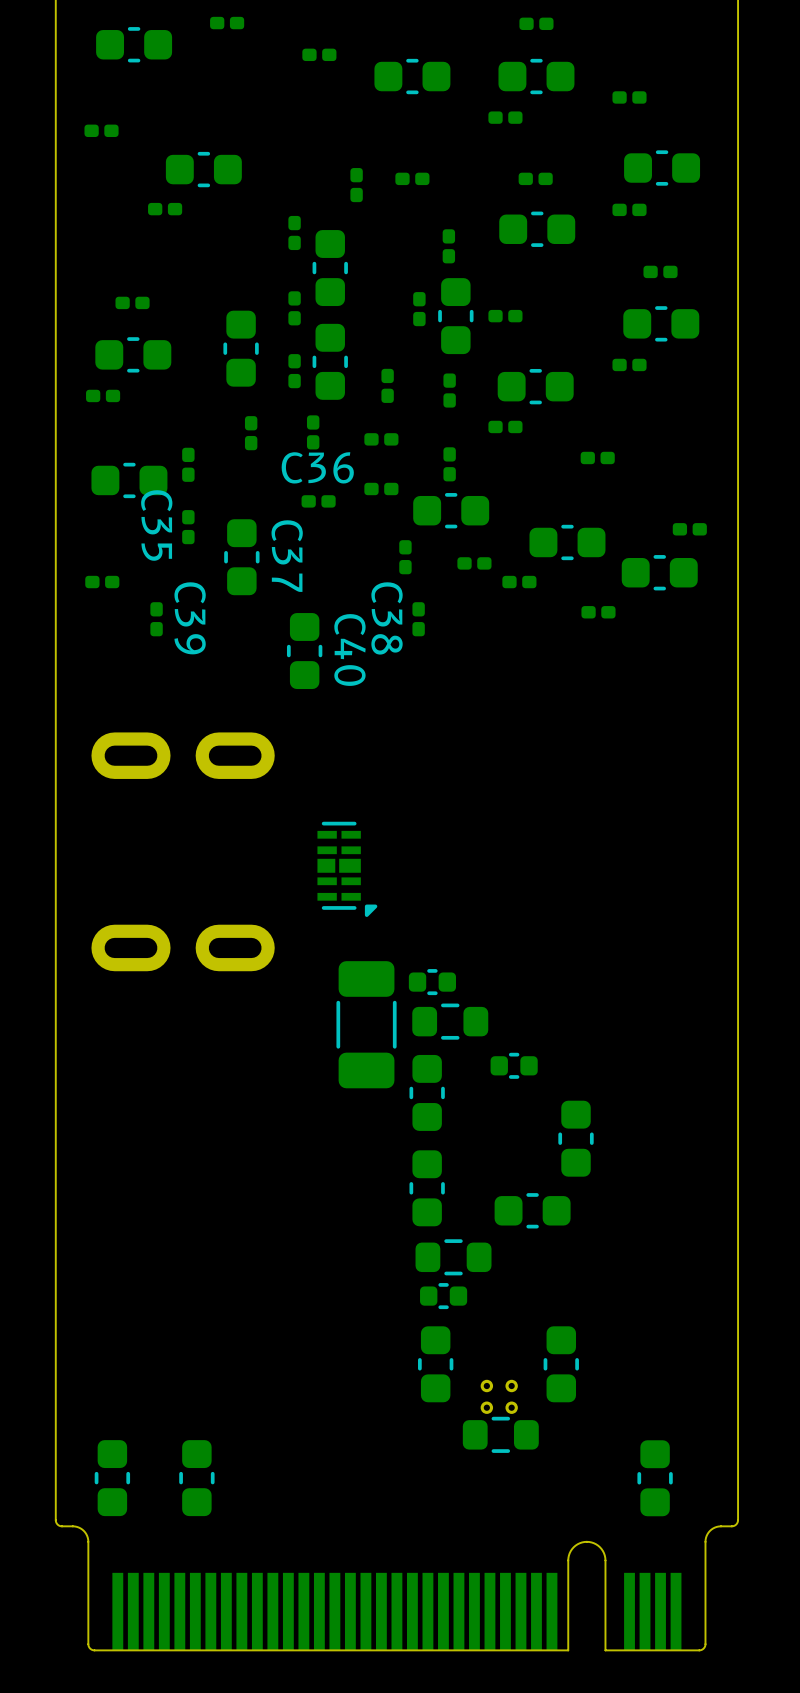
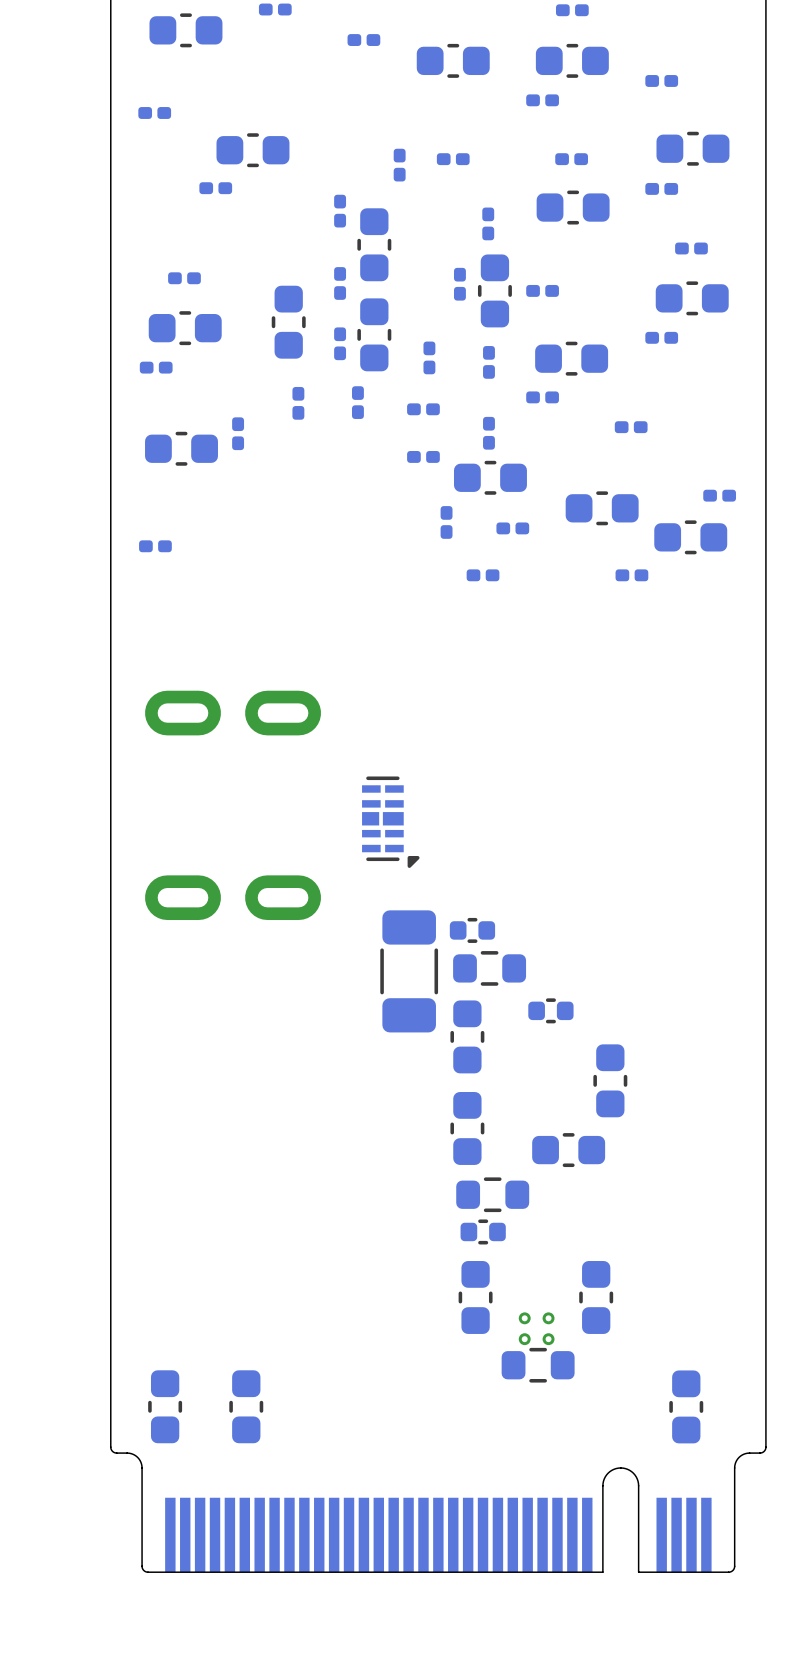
C36: (318, 501) -> none
C35: (188, 527) -> none
C37: (241, 557) -> none
part position: (519, 582) -> (483, 575)
C39: (156, 619) -> none
C38: (418, 619) -> none
C40: (304, 651) -> none

